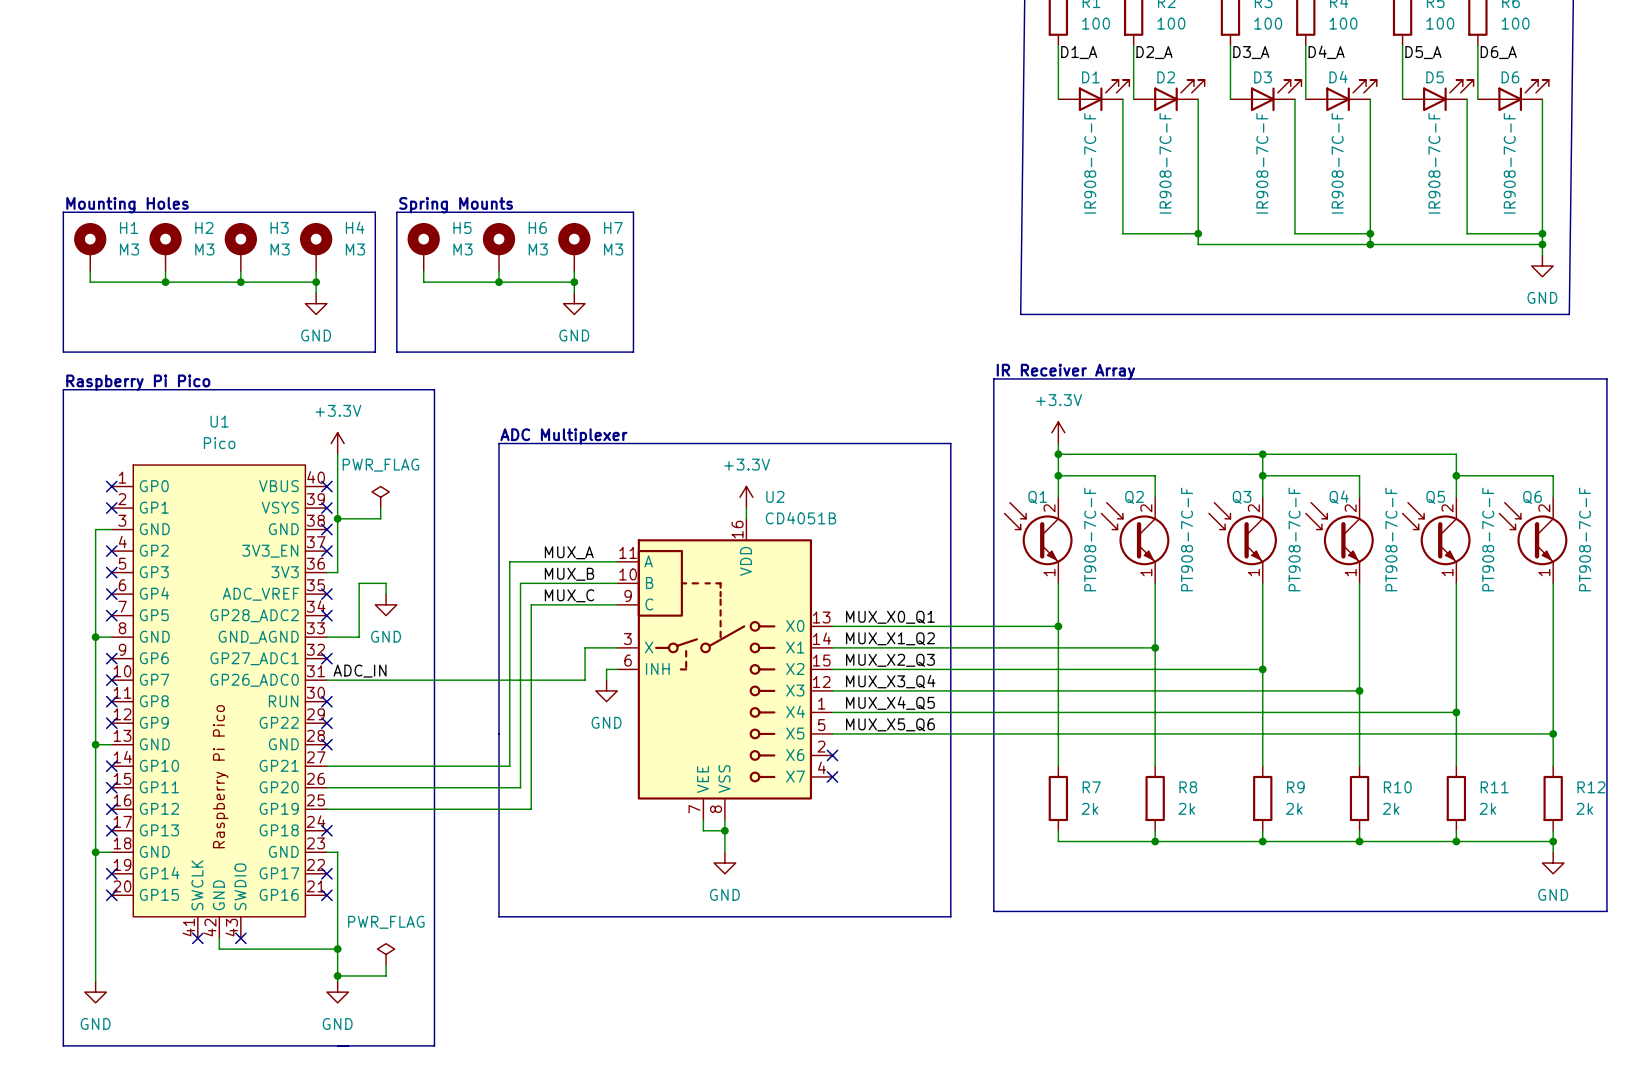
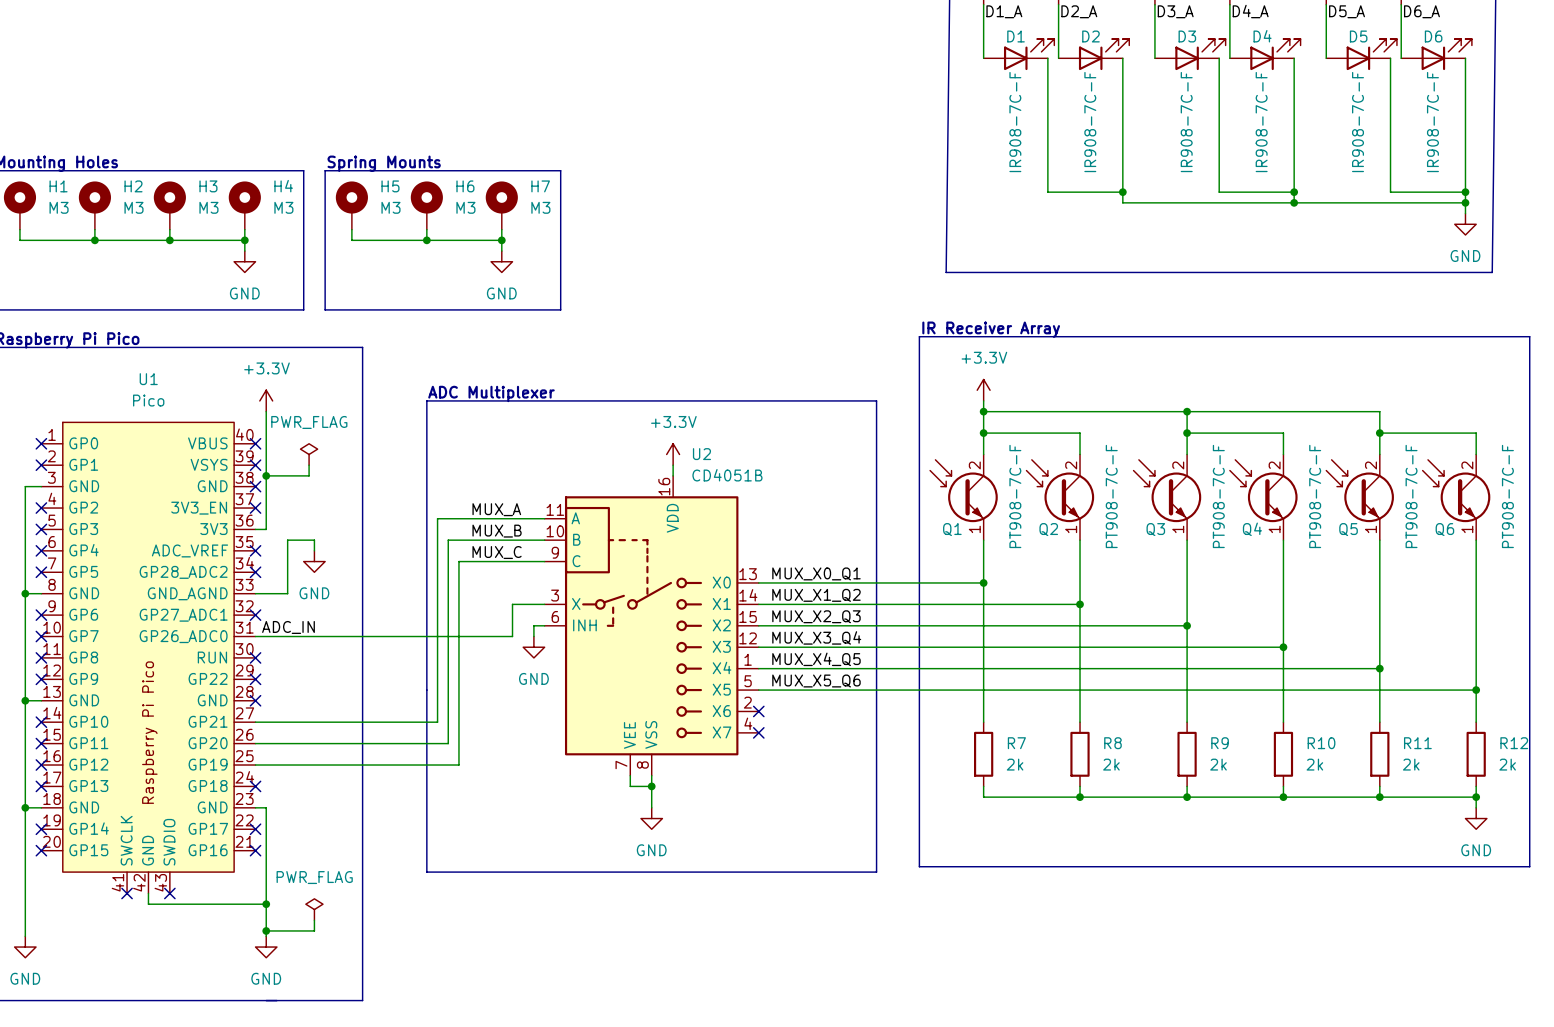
Q1 name position: Q1 (1037, 497) -> Q1 (952, 529)
Q2 name position: Q2 (1134, 497) -> Q2 (1048, 529)
Q3 name position: Q3 (1242, 497) -> Q3 (1155, 529)
Q4 name position: Q4 (1339, 497) -> Q4 (1252, 529)
Q5 name position: Q5 (1435, 497) -> Q5 (1348, 529)
Q6 name position: Q6 (1532, 497) -> Q6 (1444, 529)

